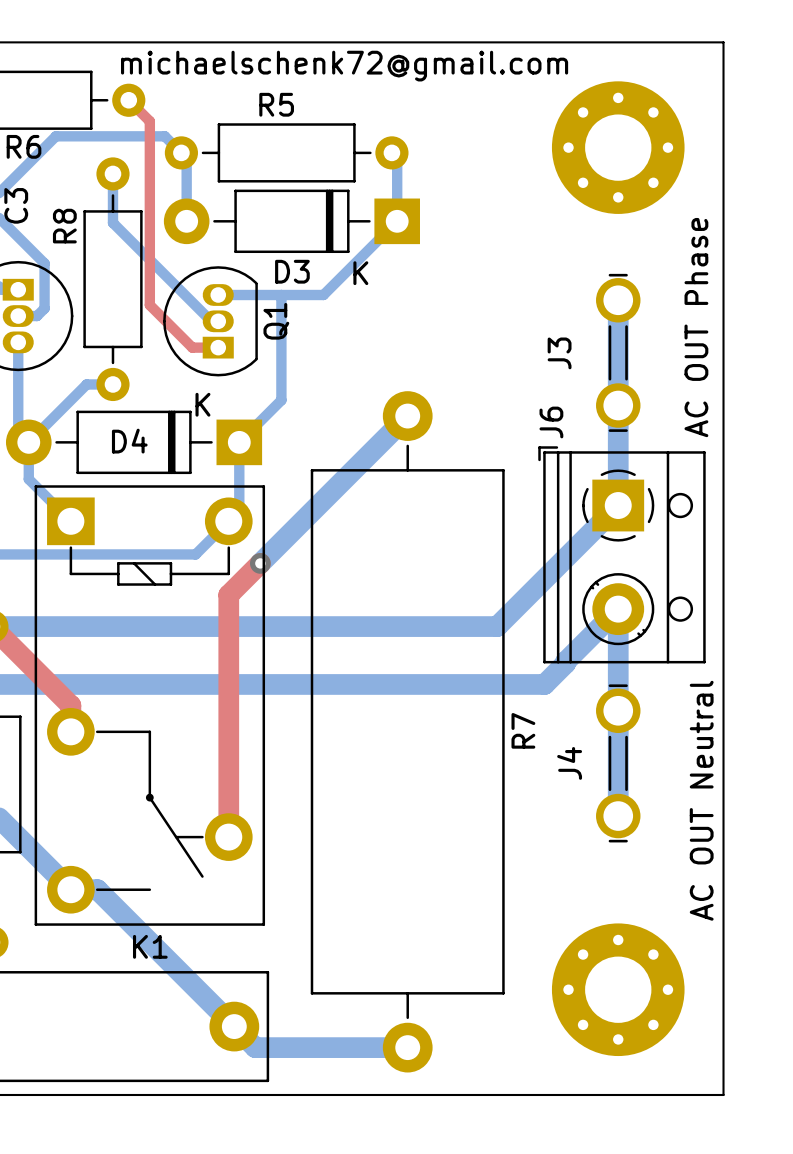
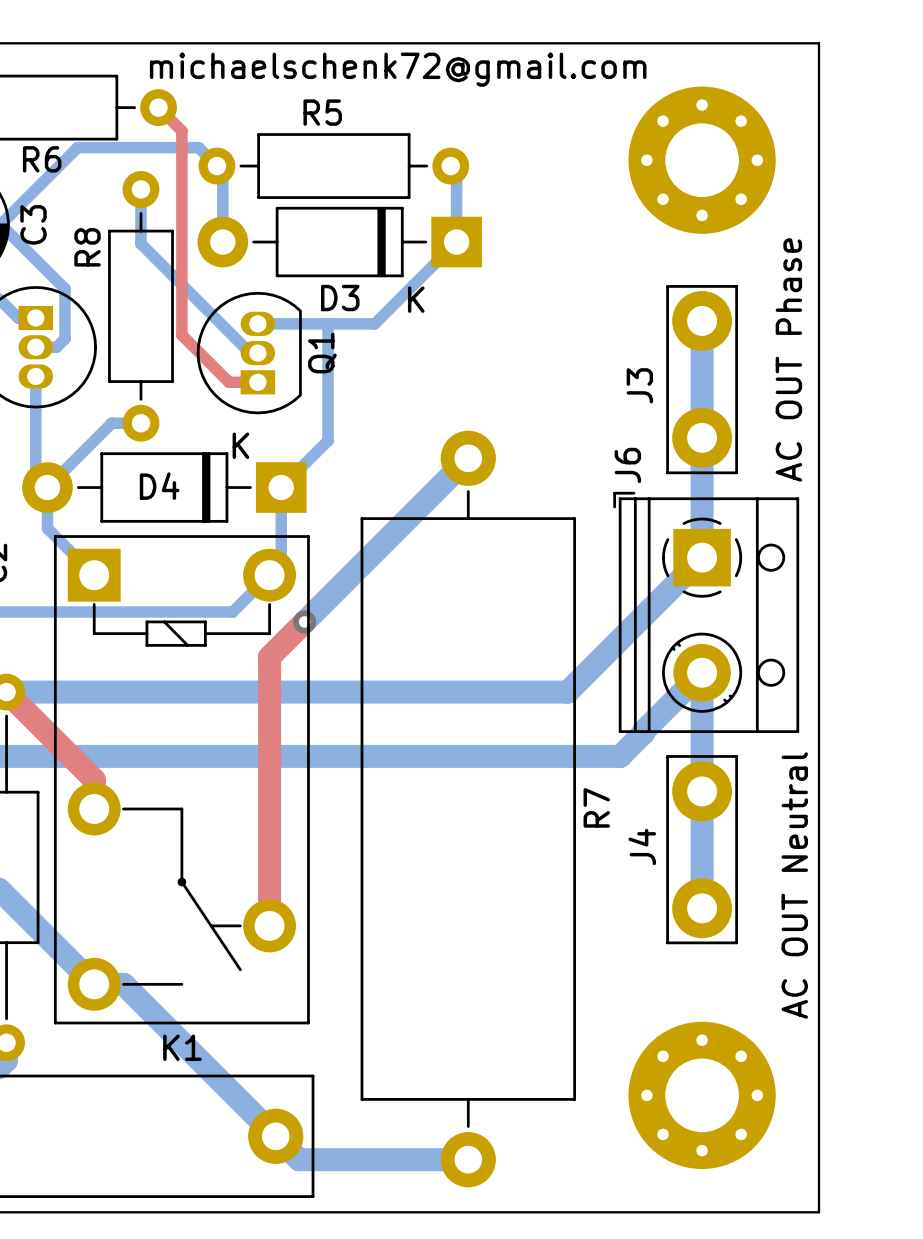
J3 footprint: [596, 273, 641, 432] -> [666, 285, 738, 475]
J4 footprint: [596, 684, 641, 843] -> [666, 755, 738, 945]

